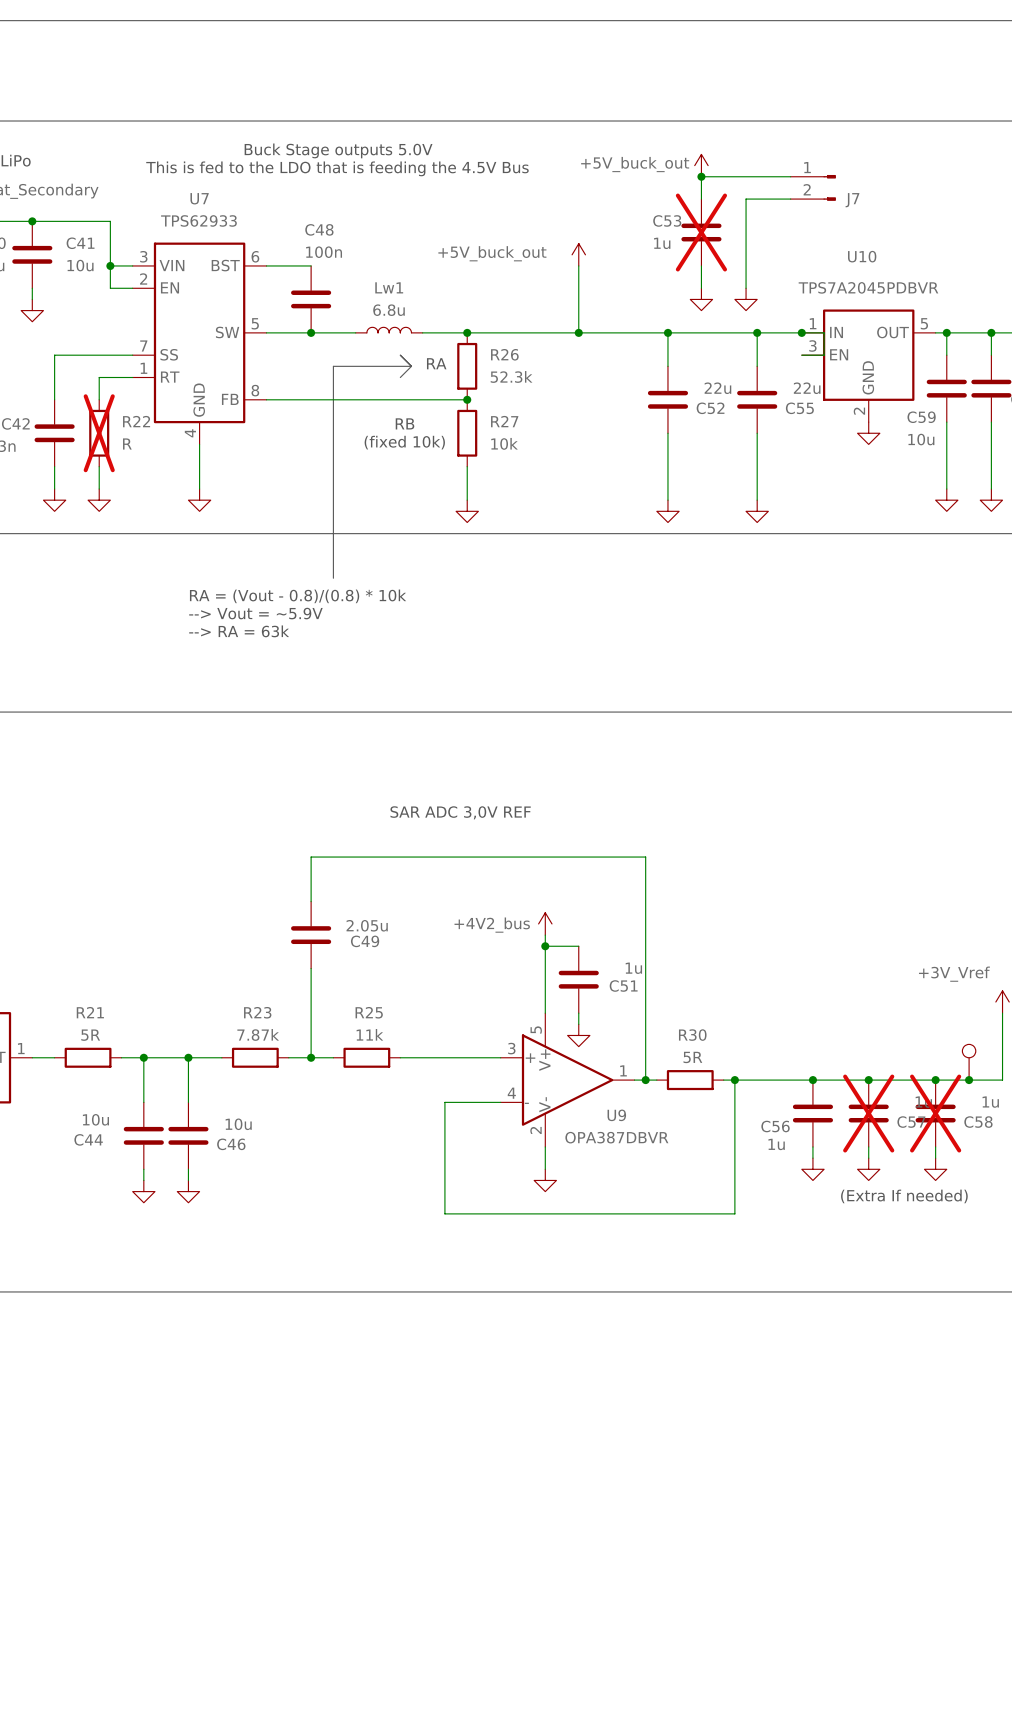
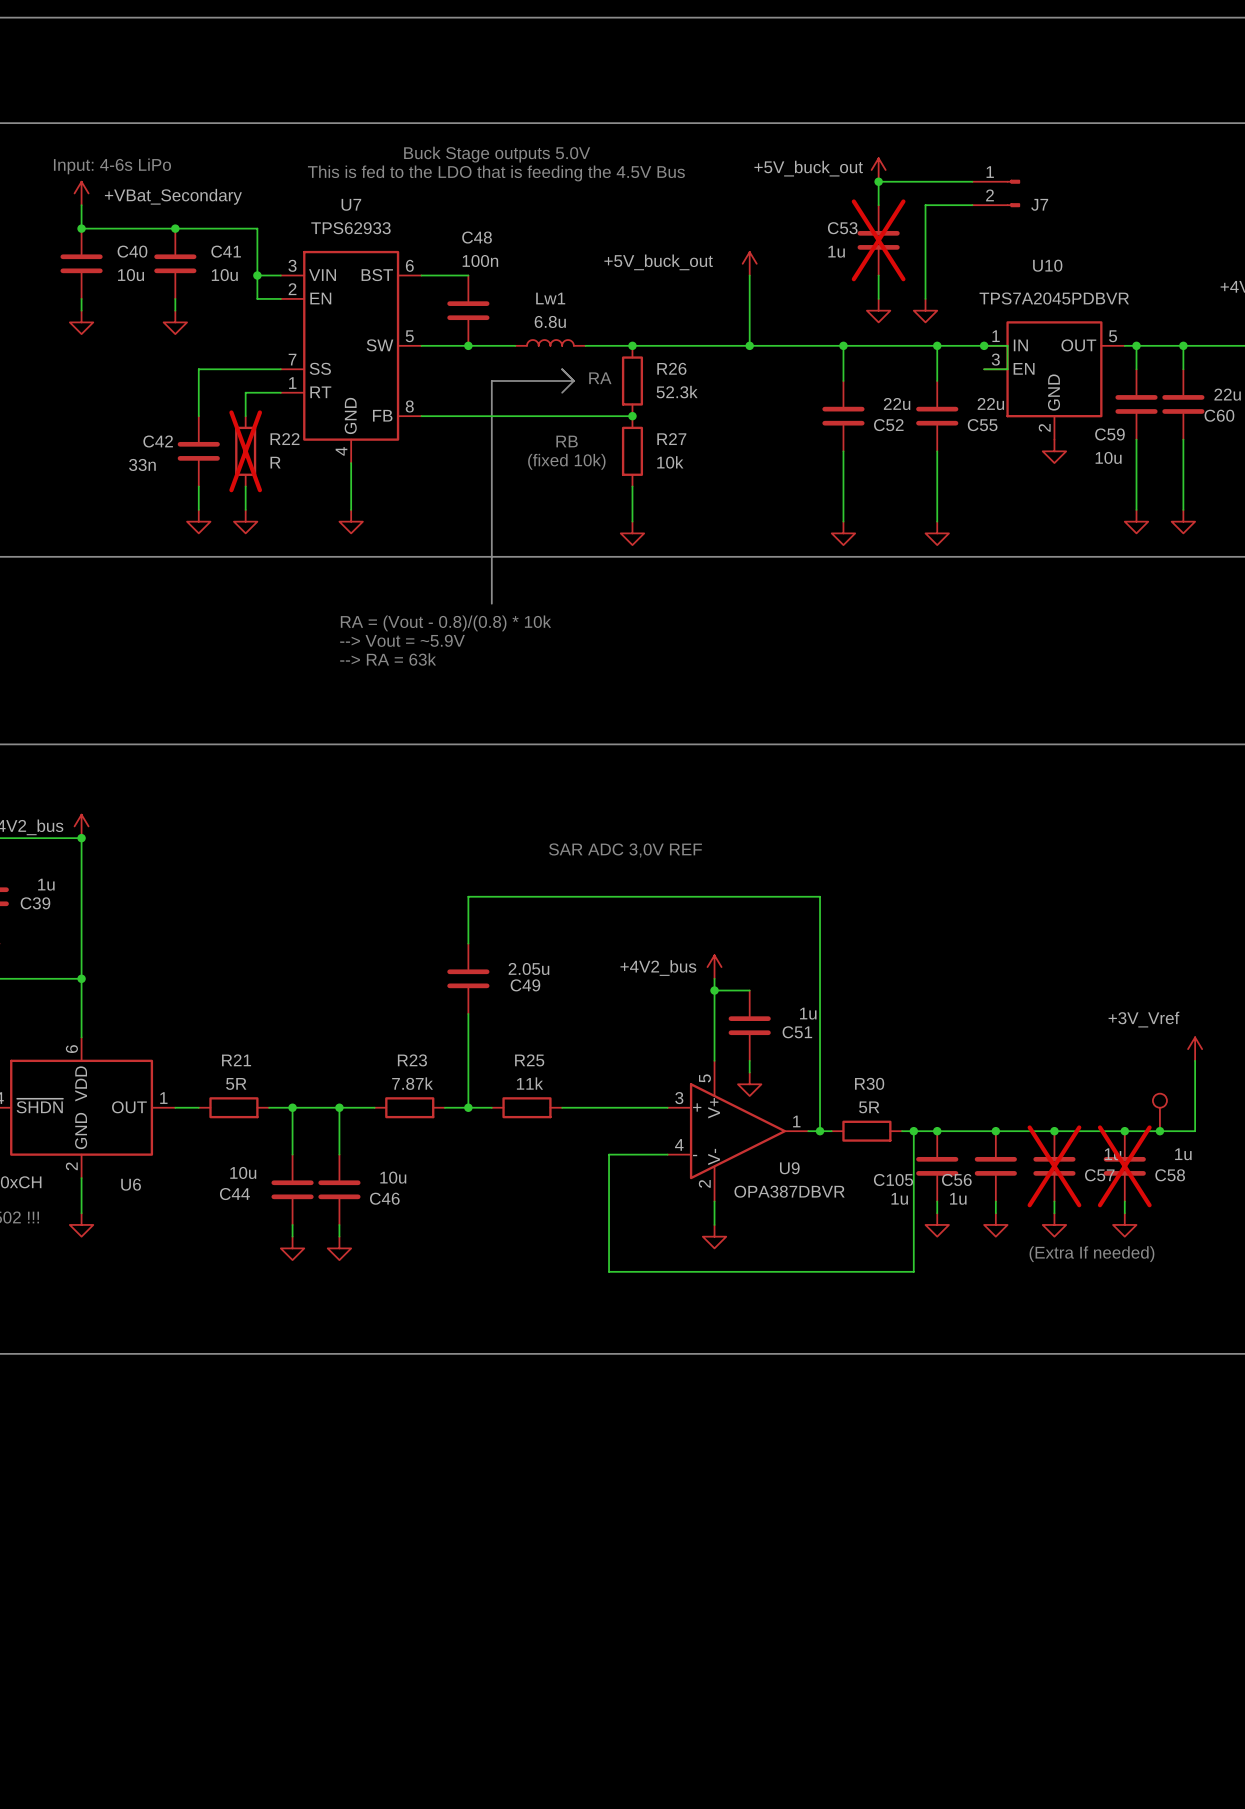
junction: none -> (937, 1131)
C105: none -> 1u (937, 1166)
wire: none -> (937, 1201) (937, 1213)
power symbol: none -> (937, 1224)

